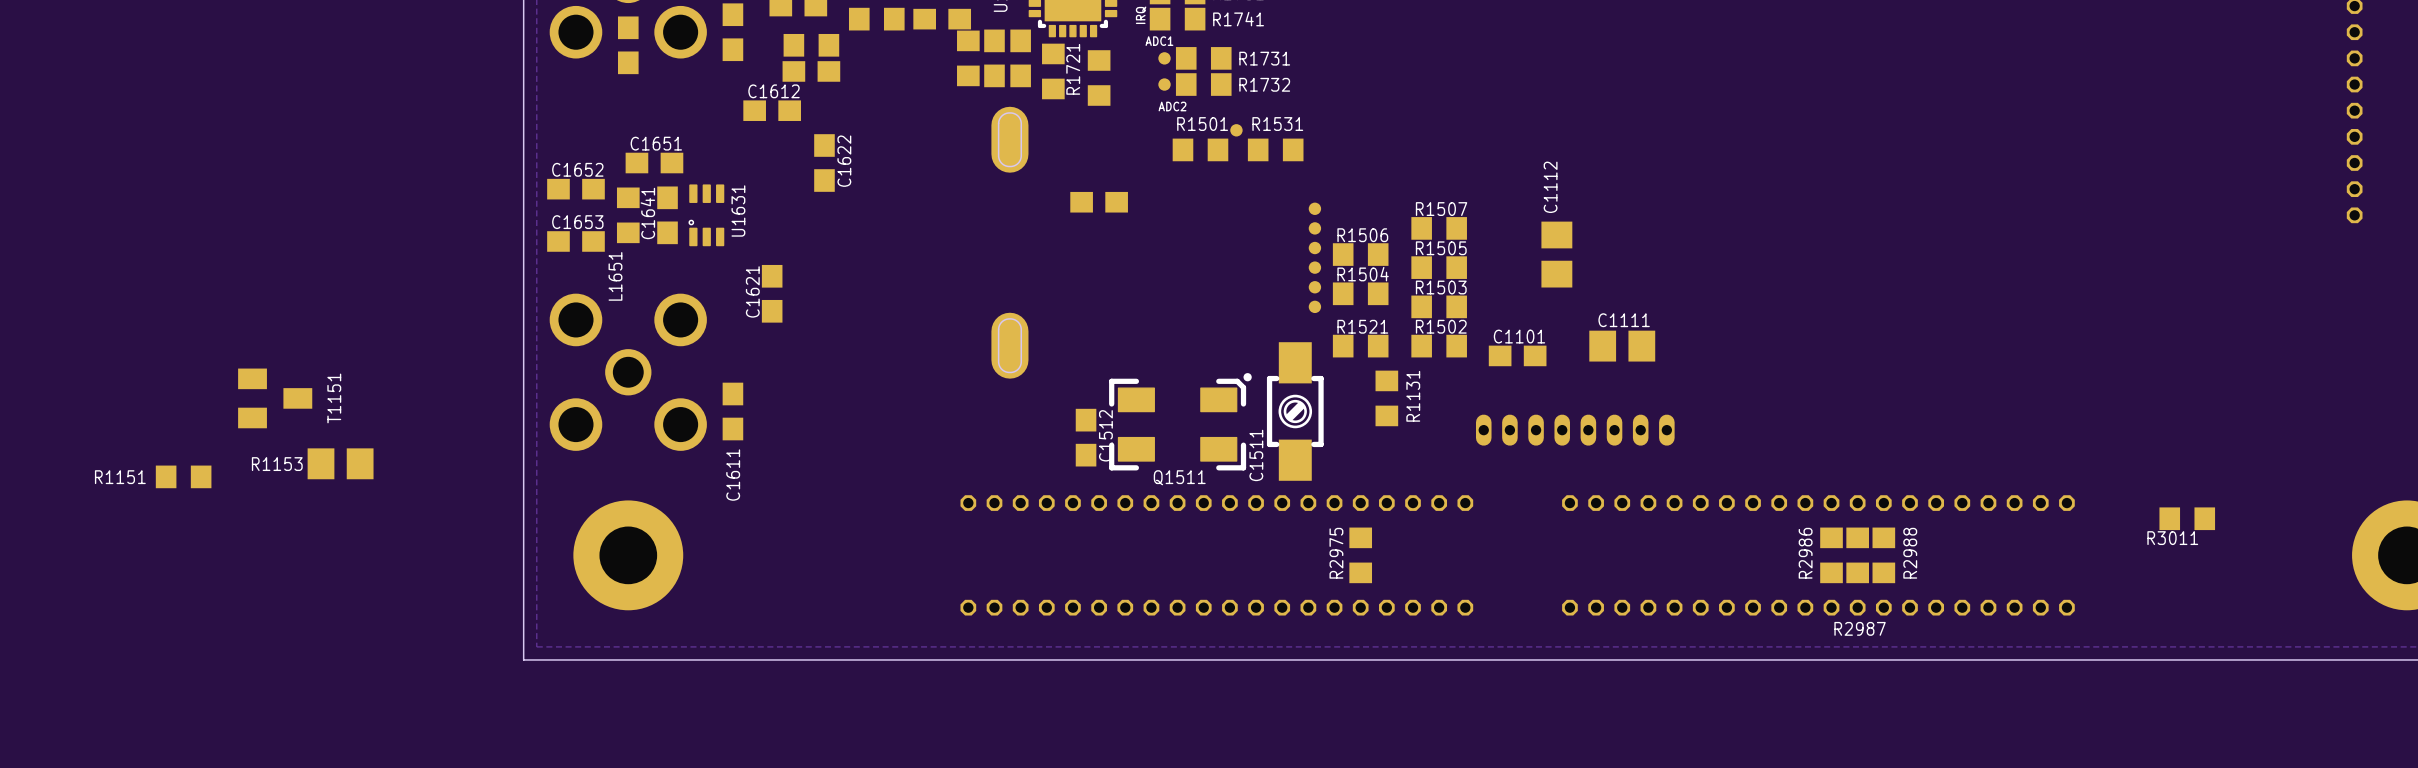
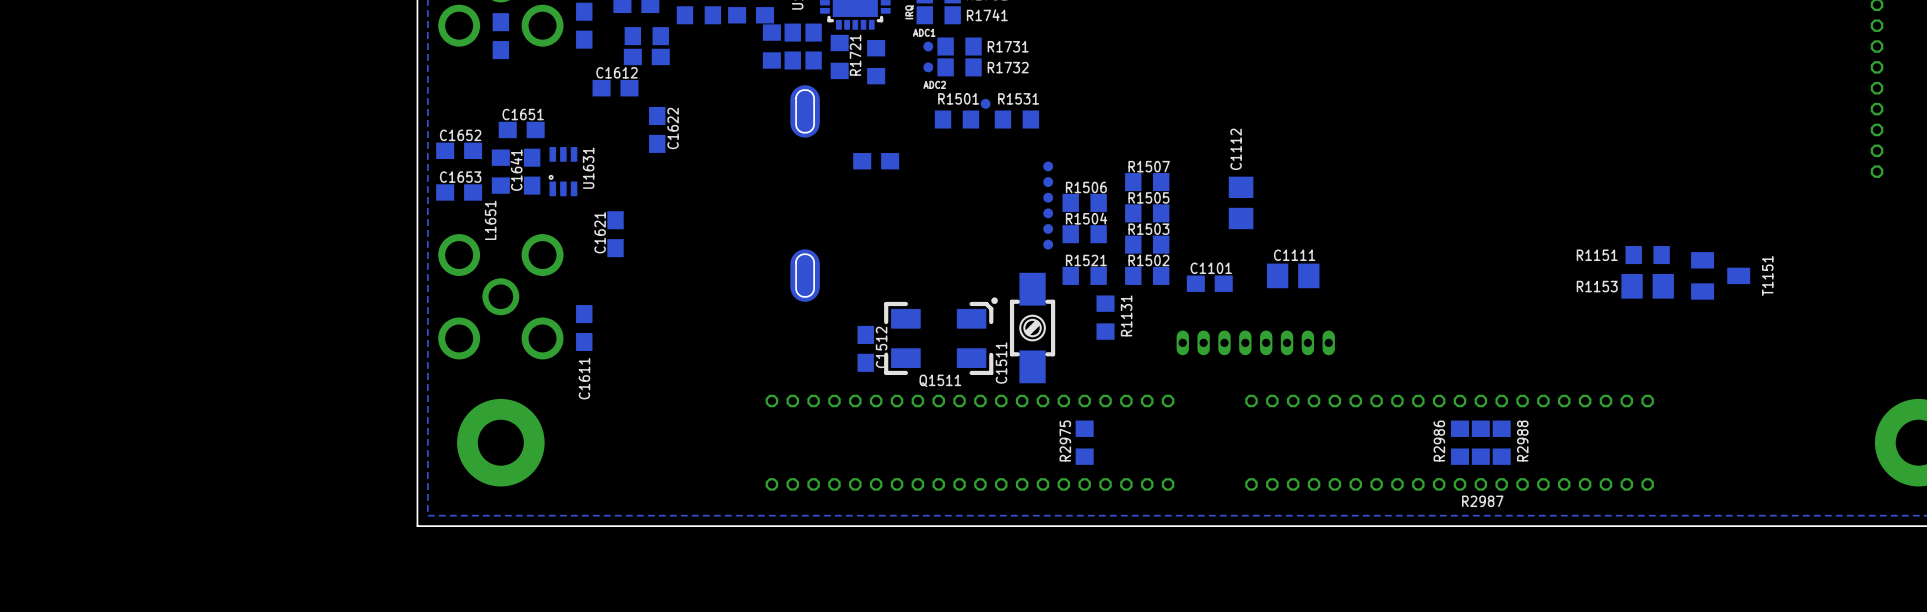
T1151 position: (275, 398) -> (1720, 275)
R1153 position: (340, 463) -> (1647, 286)
R1151 position: (183, 476) -> (1647, 255)
R3011: (2187, 518) -> none

